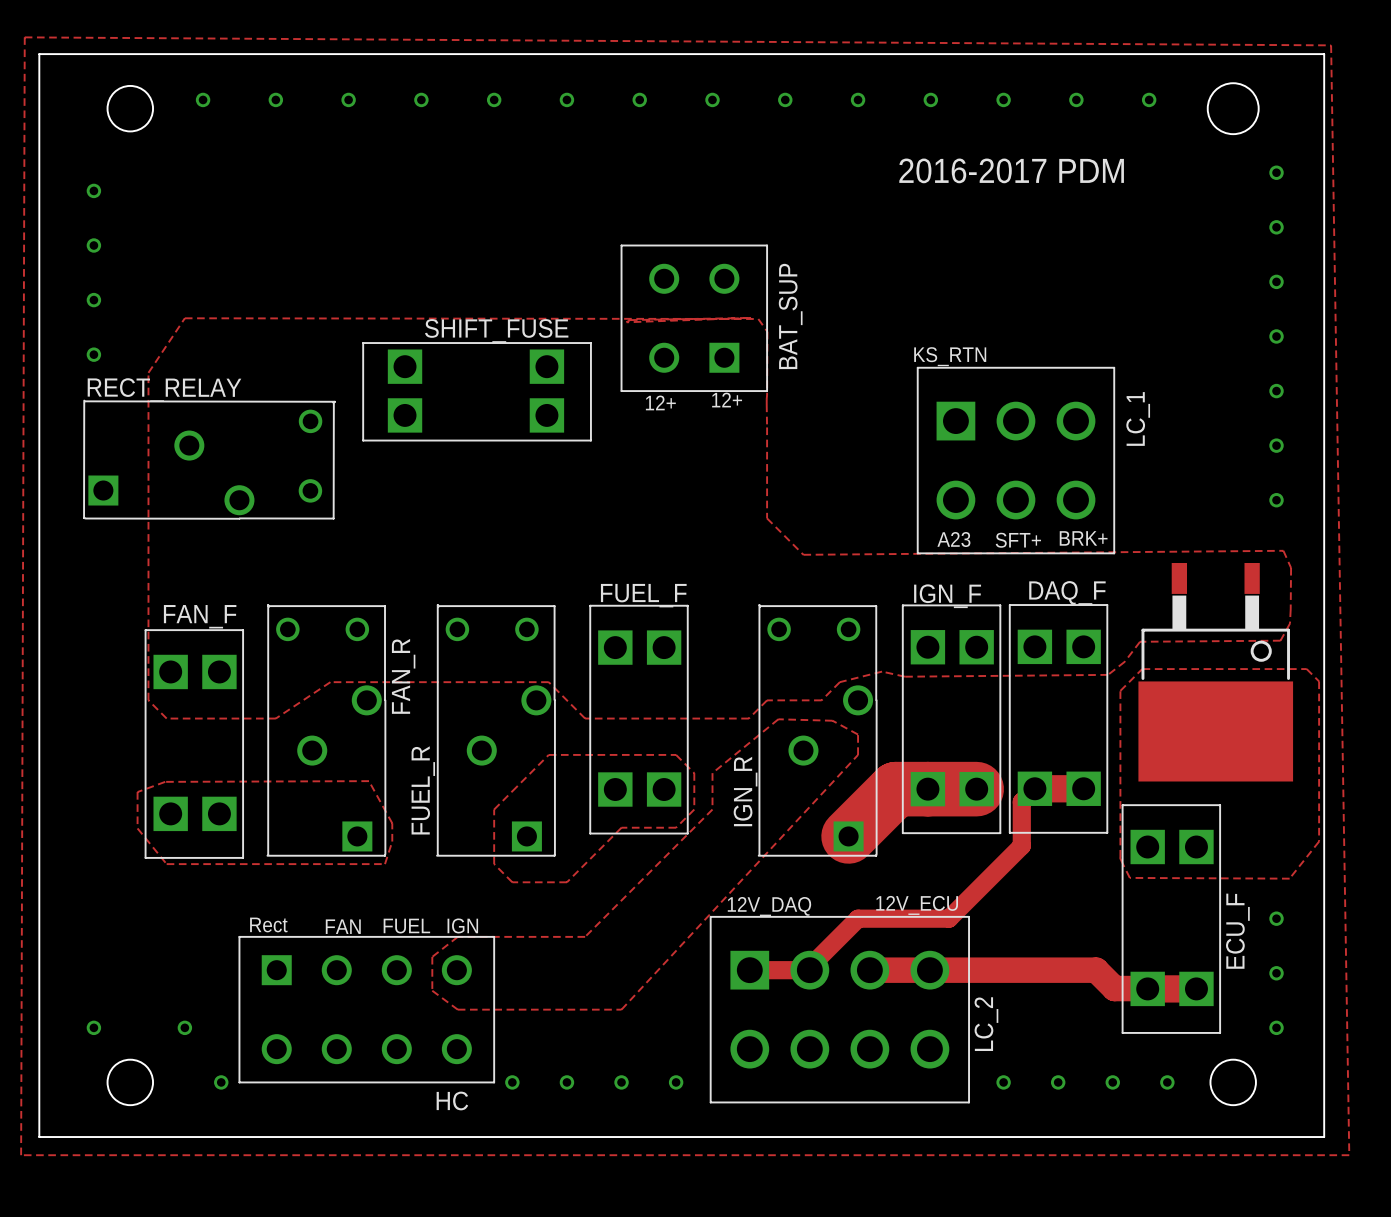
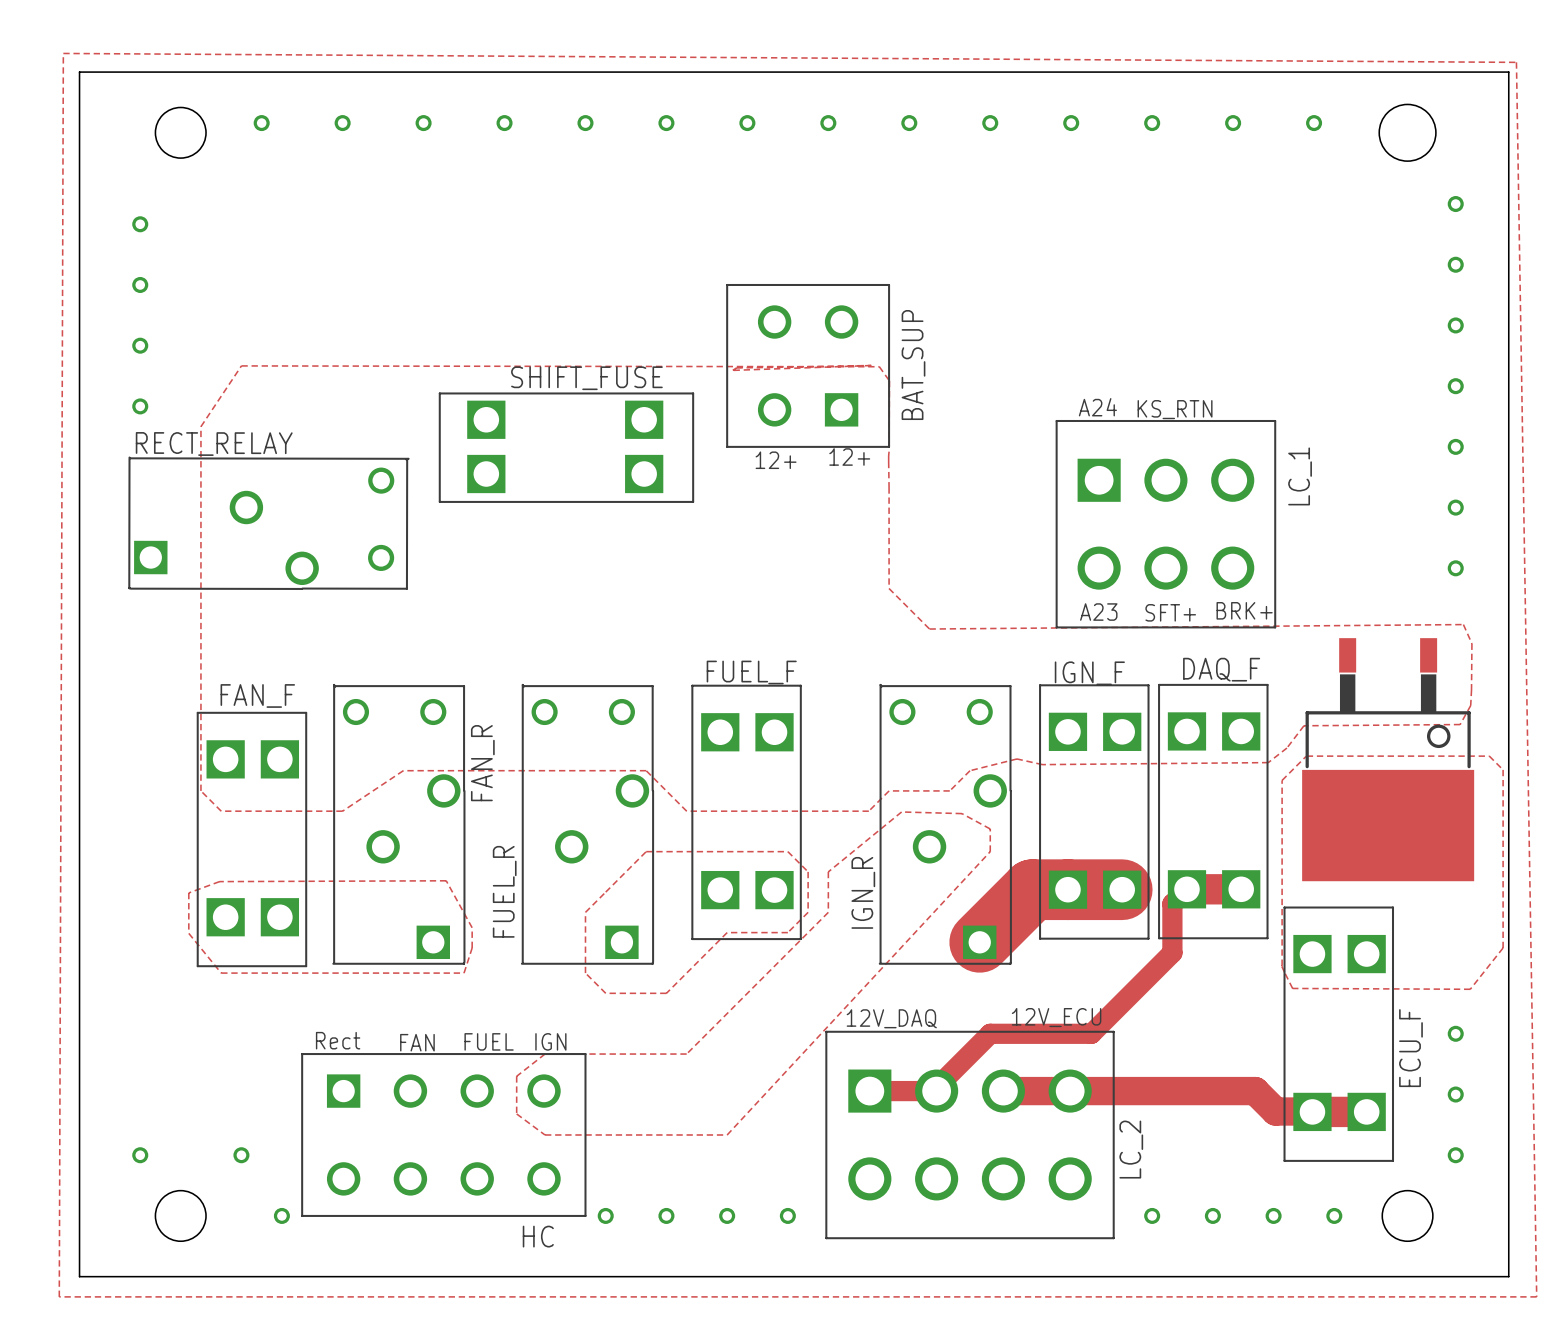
text: 2016-2017 PDM (1011, 170) -> none
text: none -> A24 (1097, 407)
text position: KS_RTN (950, 356) -> KS_RTN (1175, 409)

